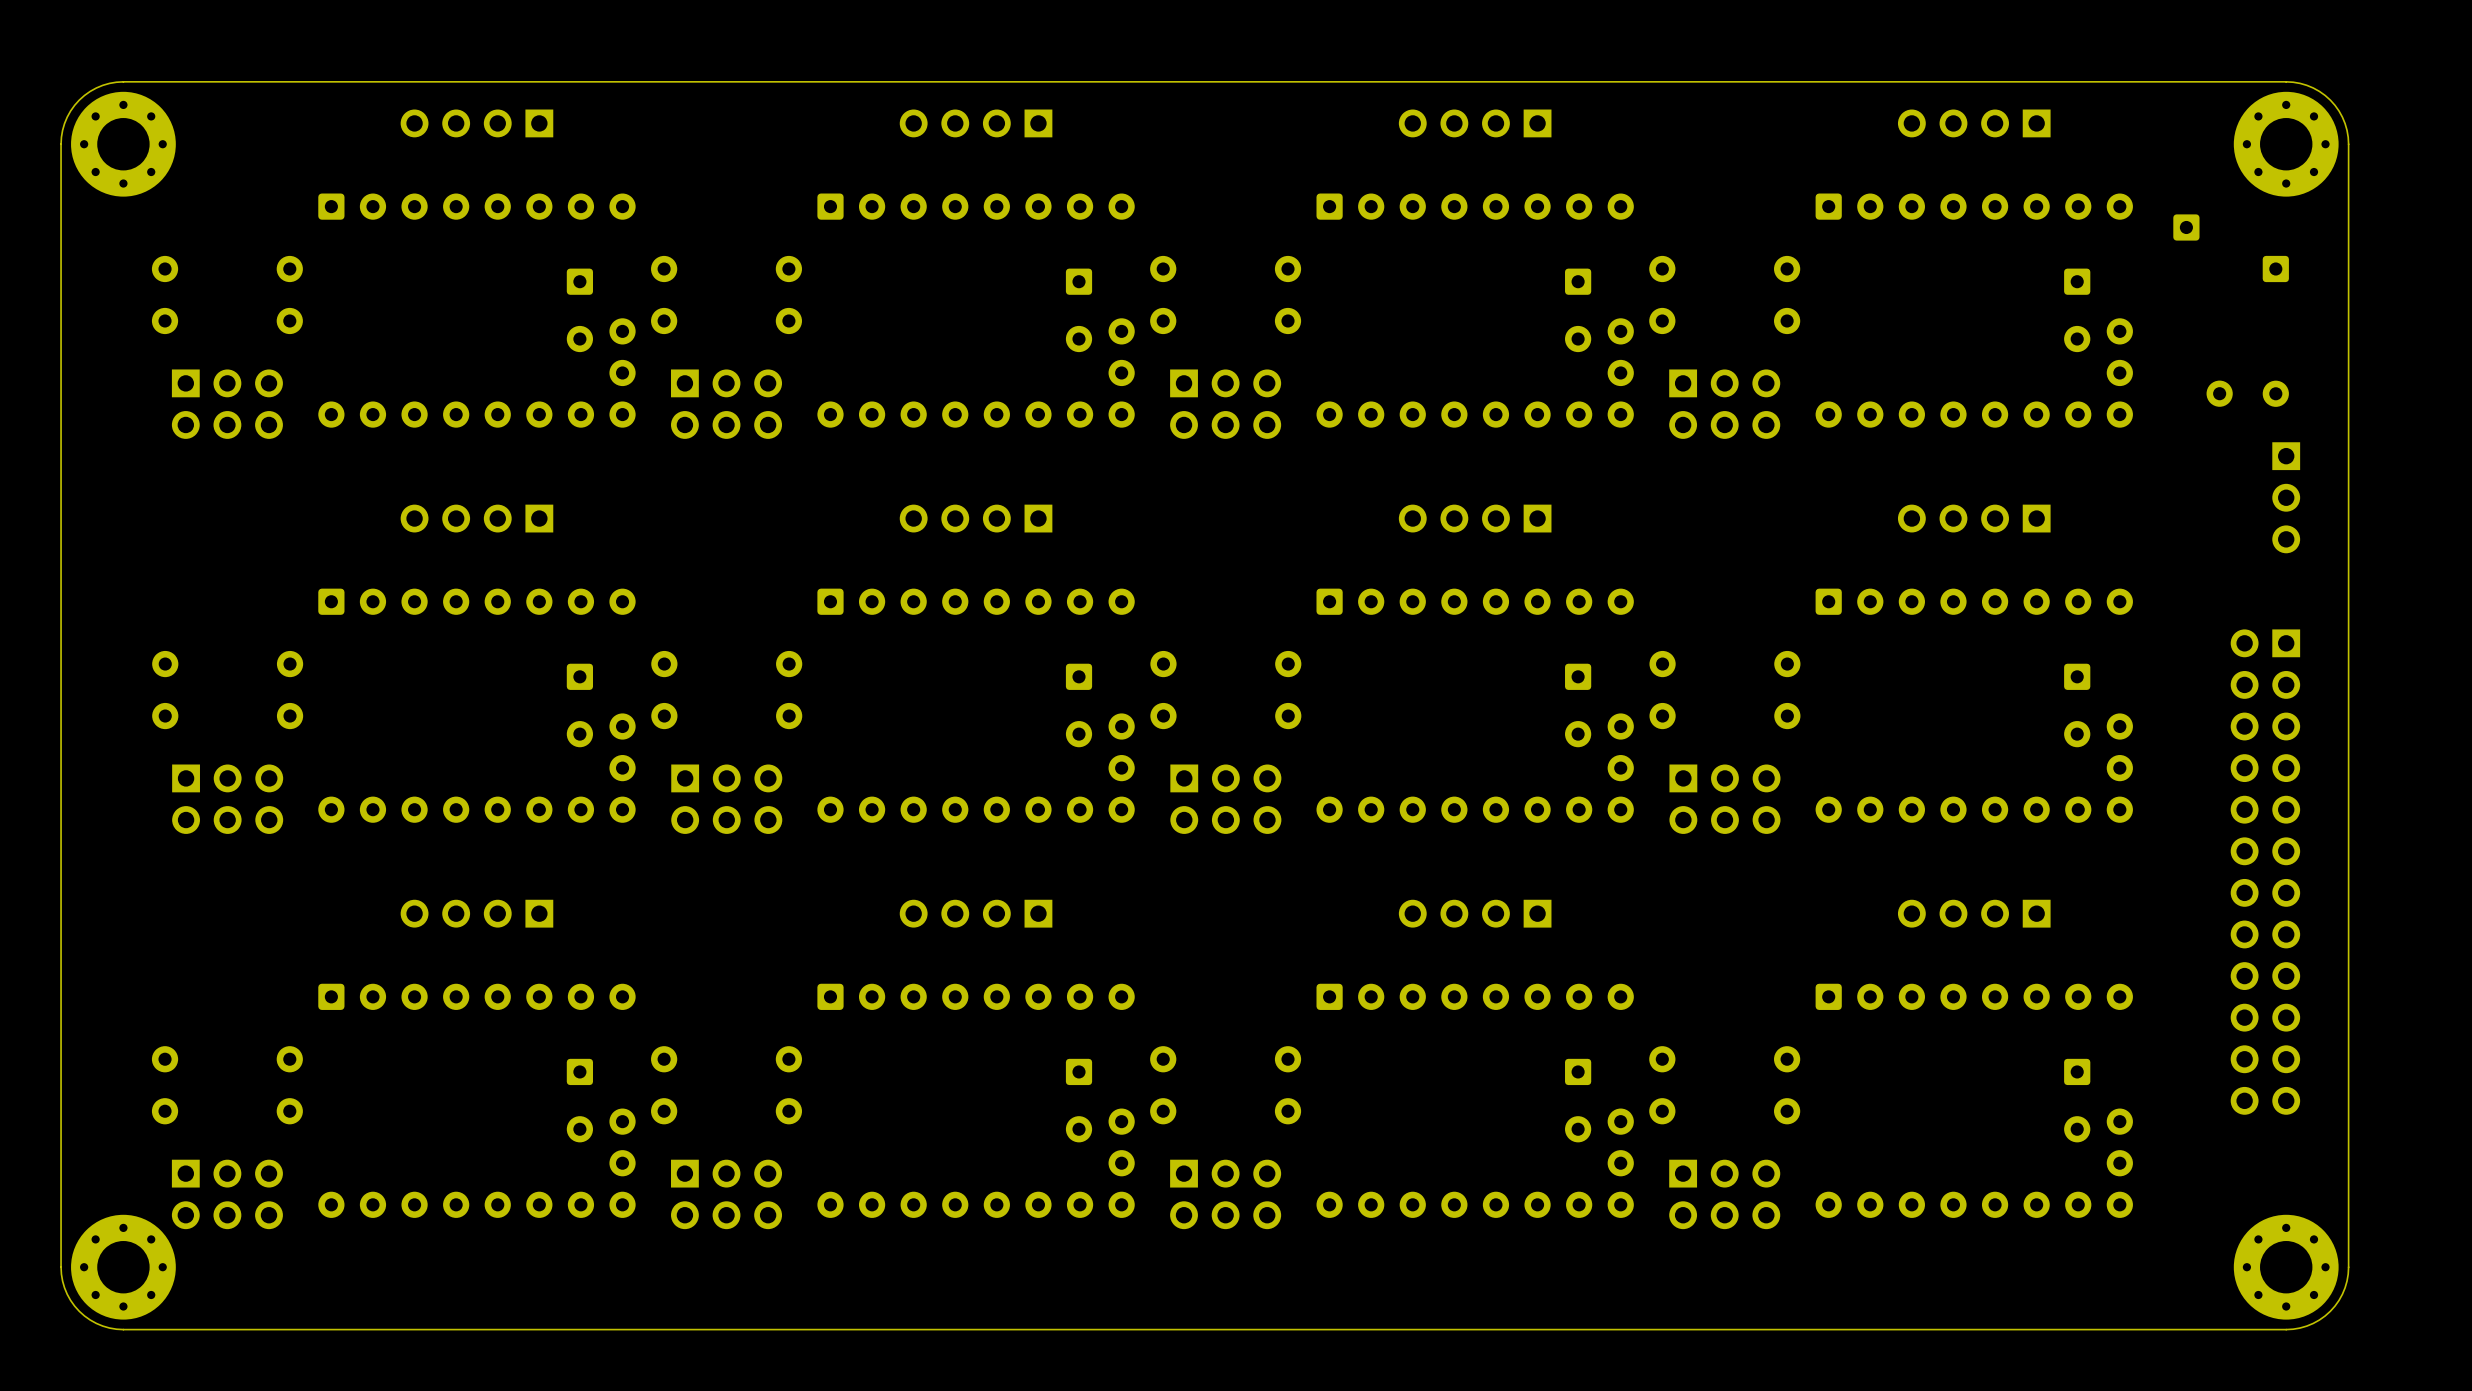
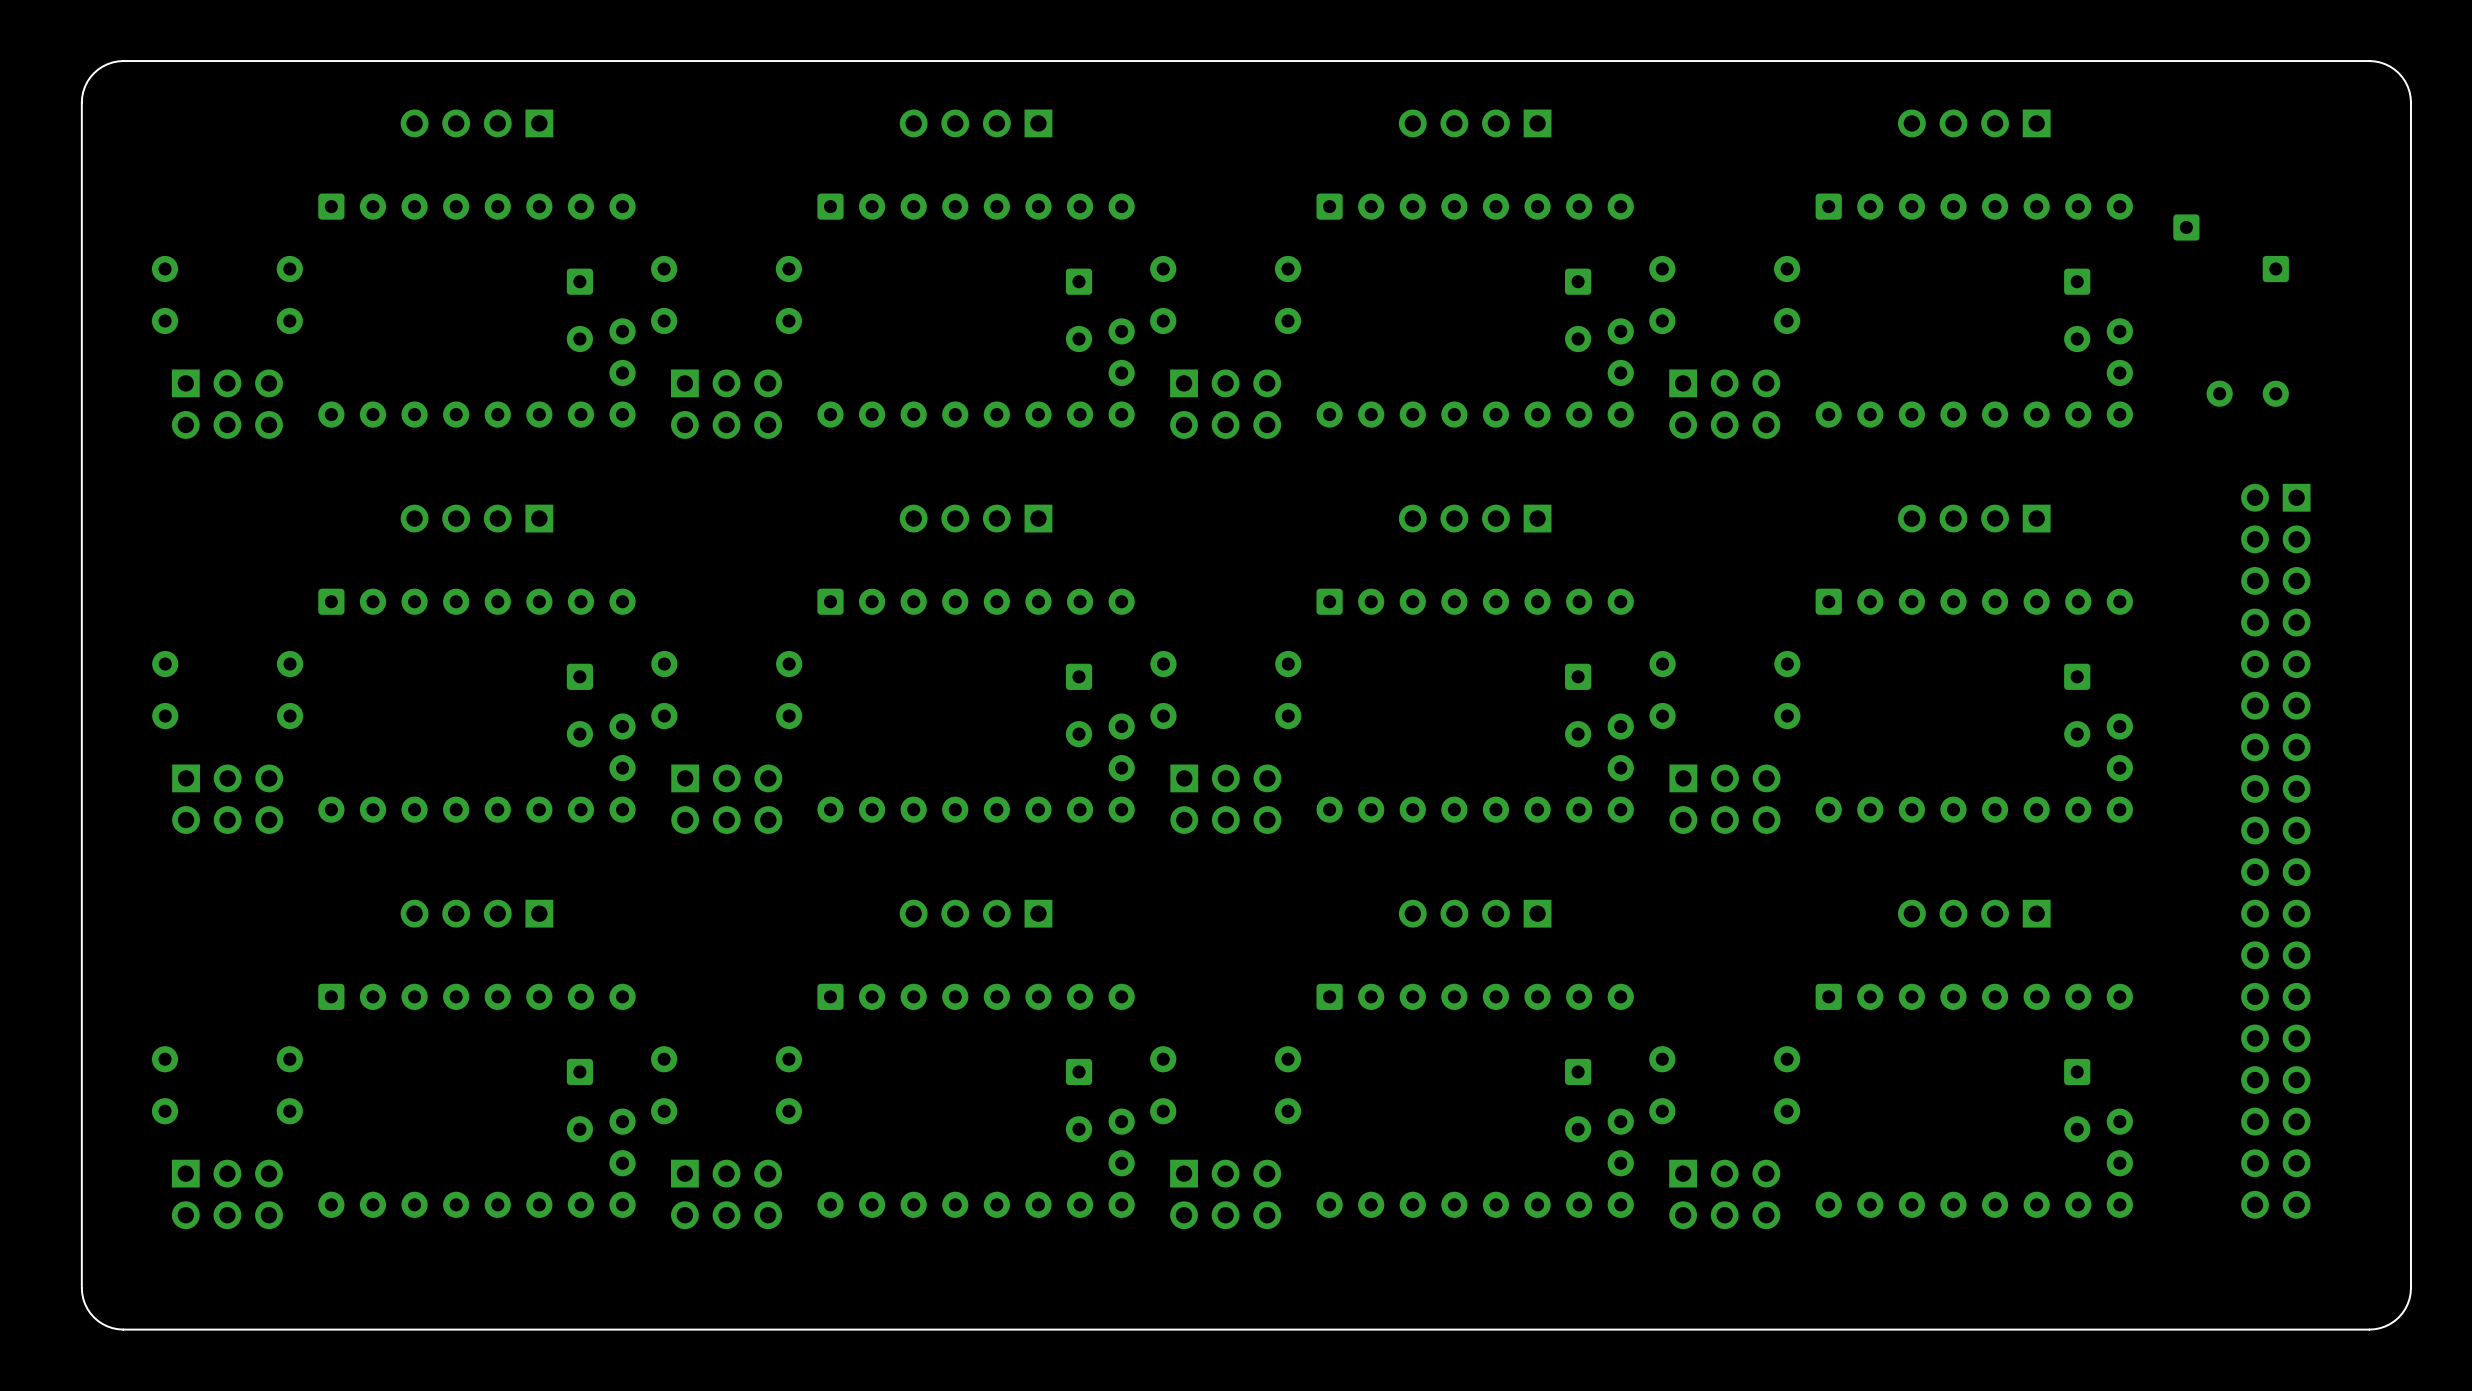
part: (123, 144) -> none
part: (2286, 144) -> none
part: (2286, 497) -> none
part: none -> (2275, 851)
part: (2265, 872) -> none
part: (123, 1267) -> none
part: (2286, 1267) -> none
board edge: (2286, 1329) (2300, 1328) (2313, 1323) (2330, 1311) (2342, 1294) (2347, 1281) (2348, 1267) (2348, 144) (2347, 130) (2342, 117) (2330, 100) (2313, 88) (2300, 83) (2286, 81) (123, 81) (102, 85) (90, 91) (79, 100) (67, 117) (62, 130) (61, 144) (61, 1267) (64, 1287) (70, 1300) (79, 1311) (96, 1323) (109, 1328) (123, 1329) -> (2286, 1329) (2380, 1328) (2398, 1317) (2407, 1303) (2410, 1293) (2410, 102) (2409, 91) (2402, 77) (2390, 66) (2374, 61) (123, 61) (102, 66) (87, 81) (81, 102) (81, 1288) (85, 1303) (94, 1317) (107, 1326) (123, 1329)

